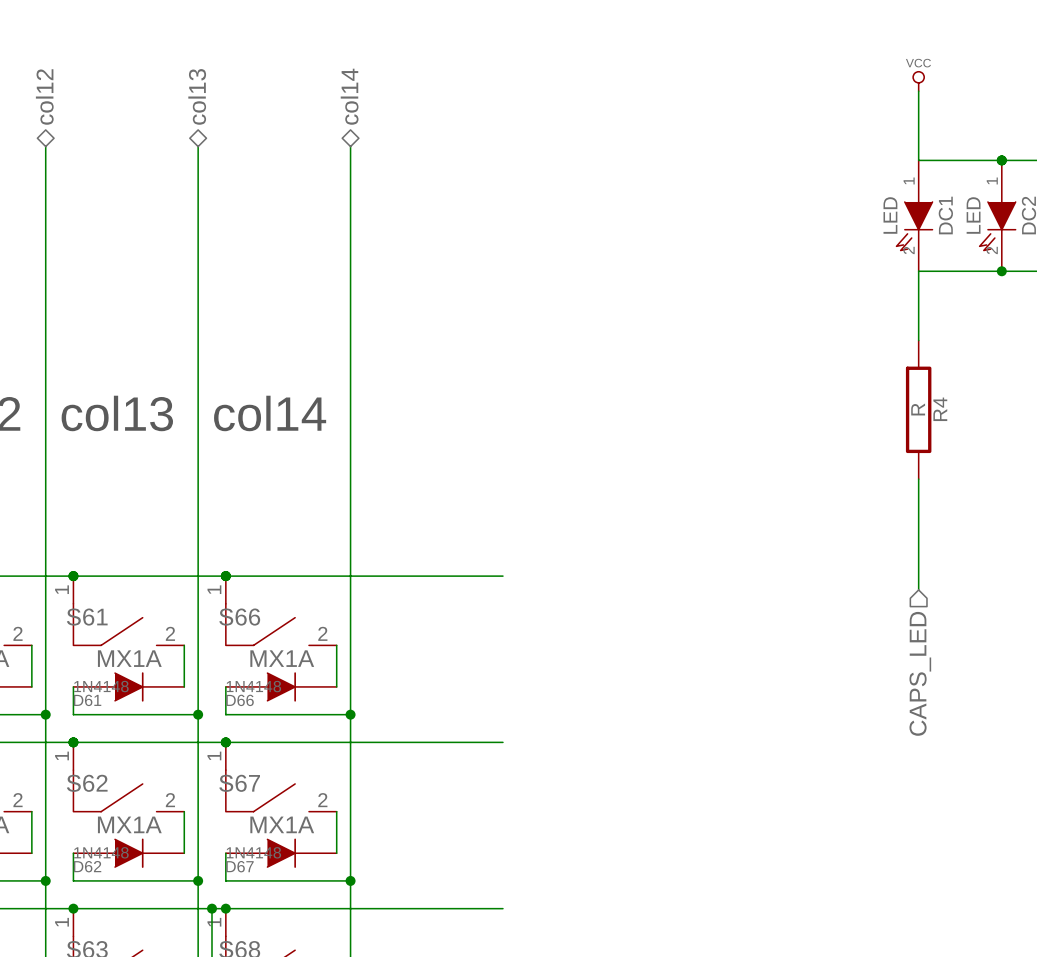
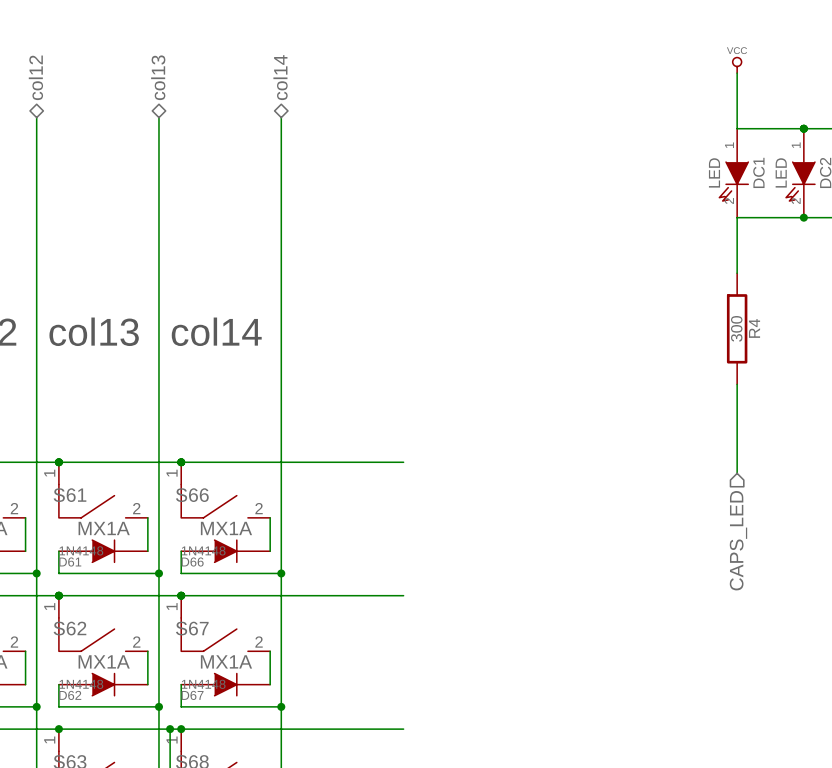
R4 value: R (918, 409) -> 300 (736, 328)

